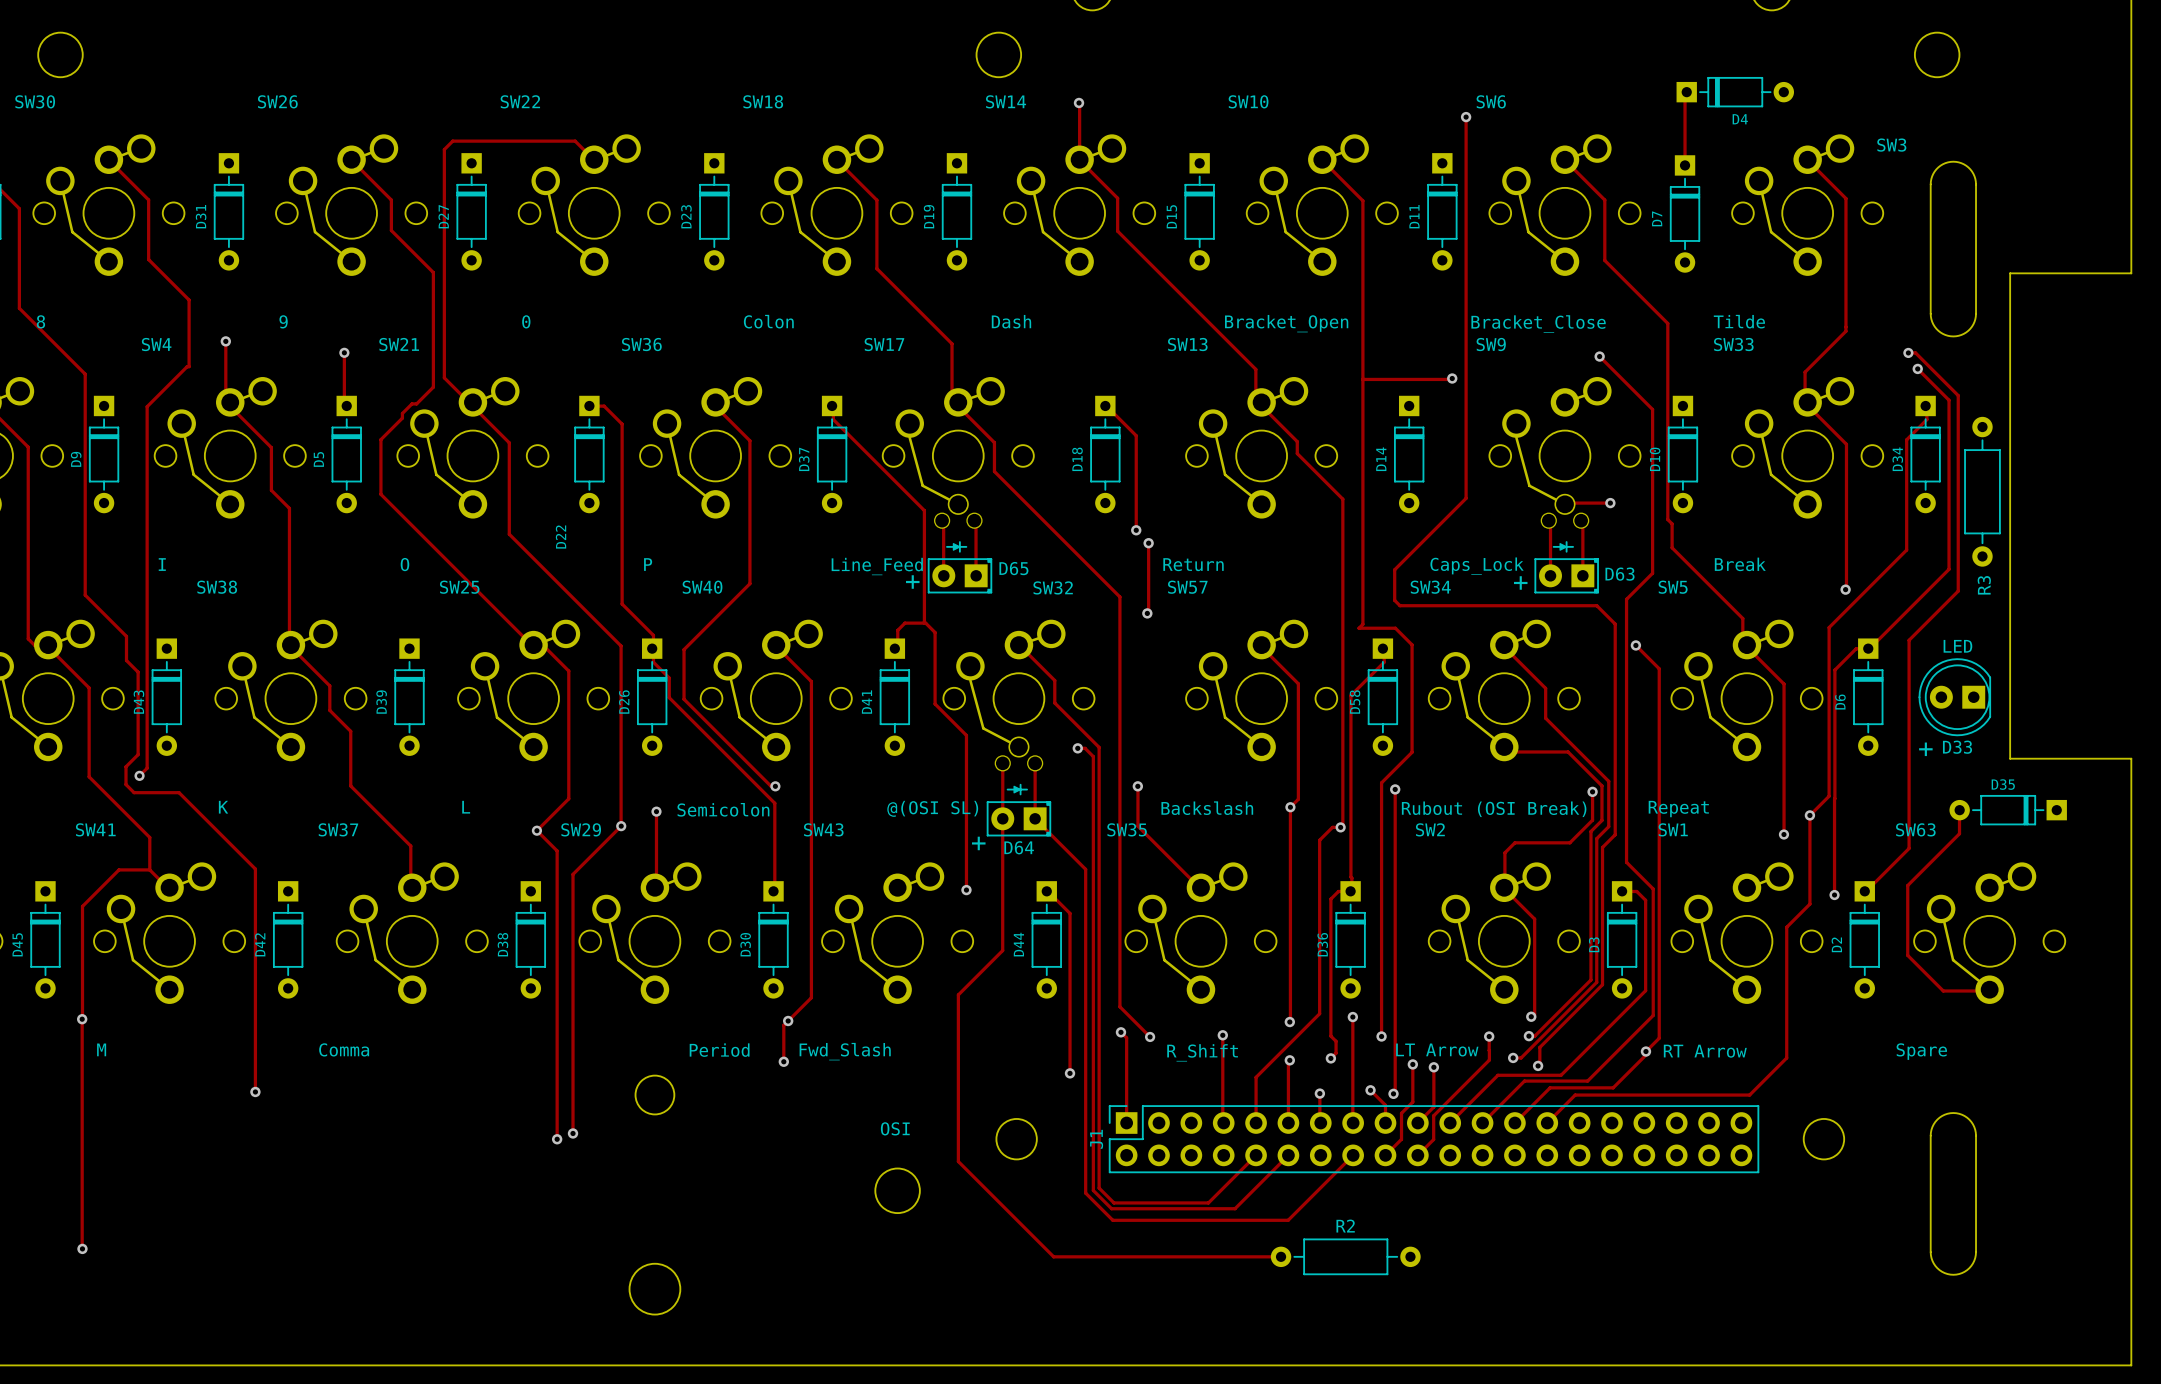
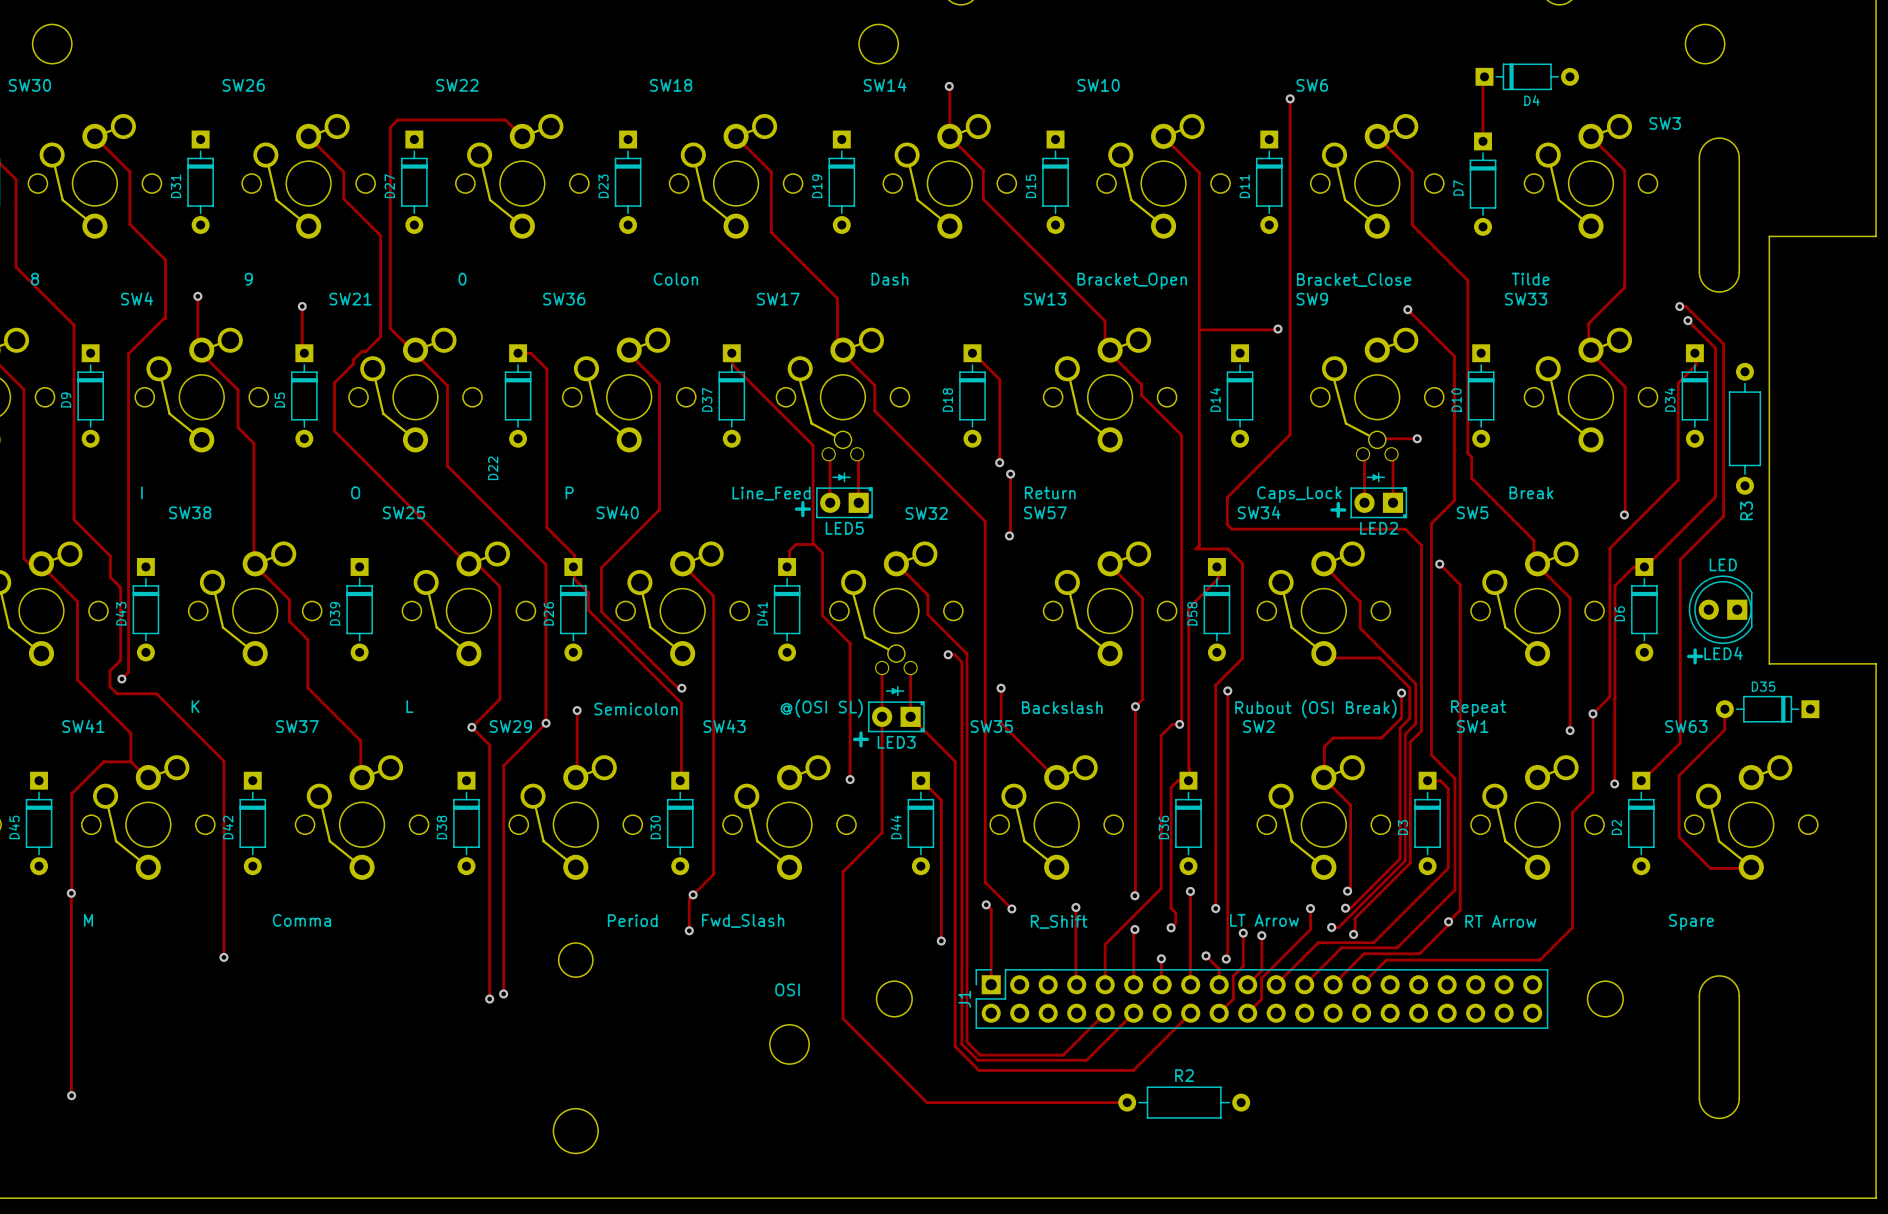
D65 name: D65 (1013, 568) -> LED5 (844, 528)
D63 name: D63 (1620, 574) -> LED2 (1379, 528)
D33 name: D33 (1957, 747) -> LED4 (1723, 653)
D64 name: D64 (1019, 847) -> LED3 (896, 742)

